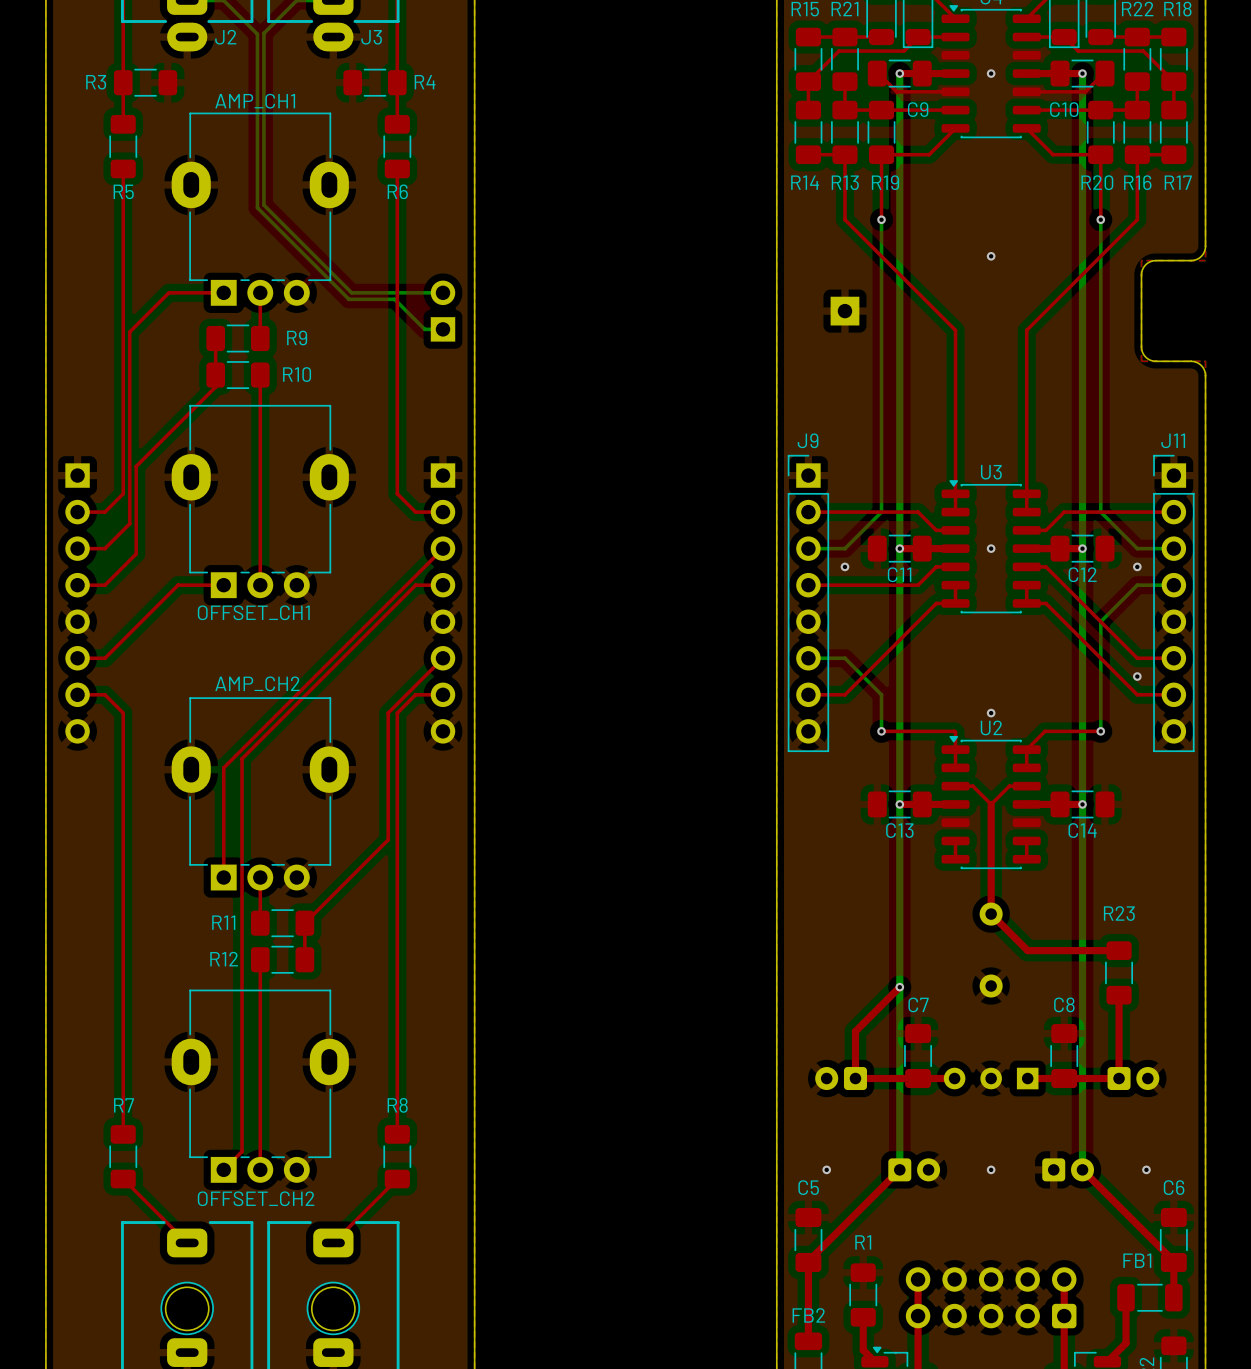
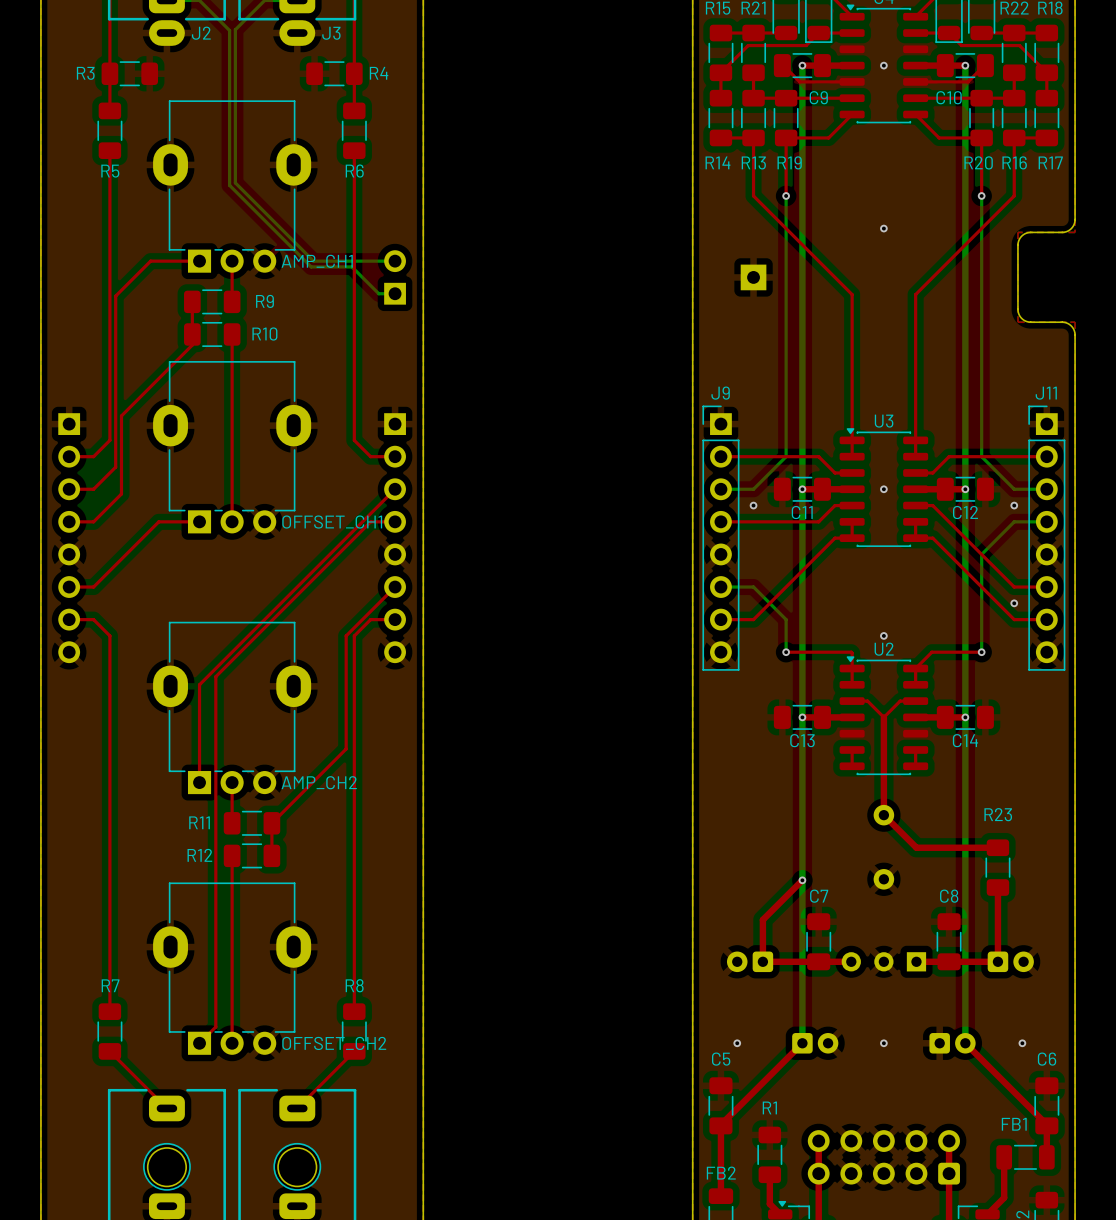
AMP_CH1 name position: AMP_CH1 (255, 101) -> AMP_CH1 (317, 261)
OFFSET_CH1 name position: OFFSET_CH1 (253, 612) -> OFFSET_CH1 (332, 522)
AMP_CH2 name position: AMP_CH2 (257, 683) -> AMP_CH2 (319, 782)
OFFSET_CH2 name position: OFFSET_CH2 (256, 1198) -> OFFSET_CH2 (334, 1043)

